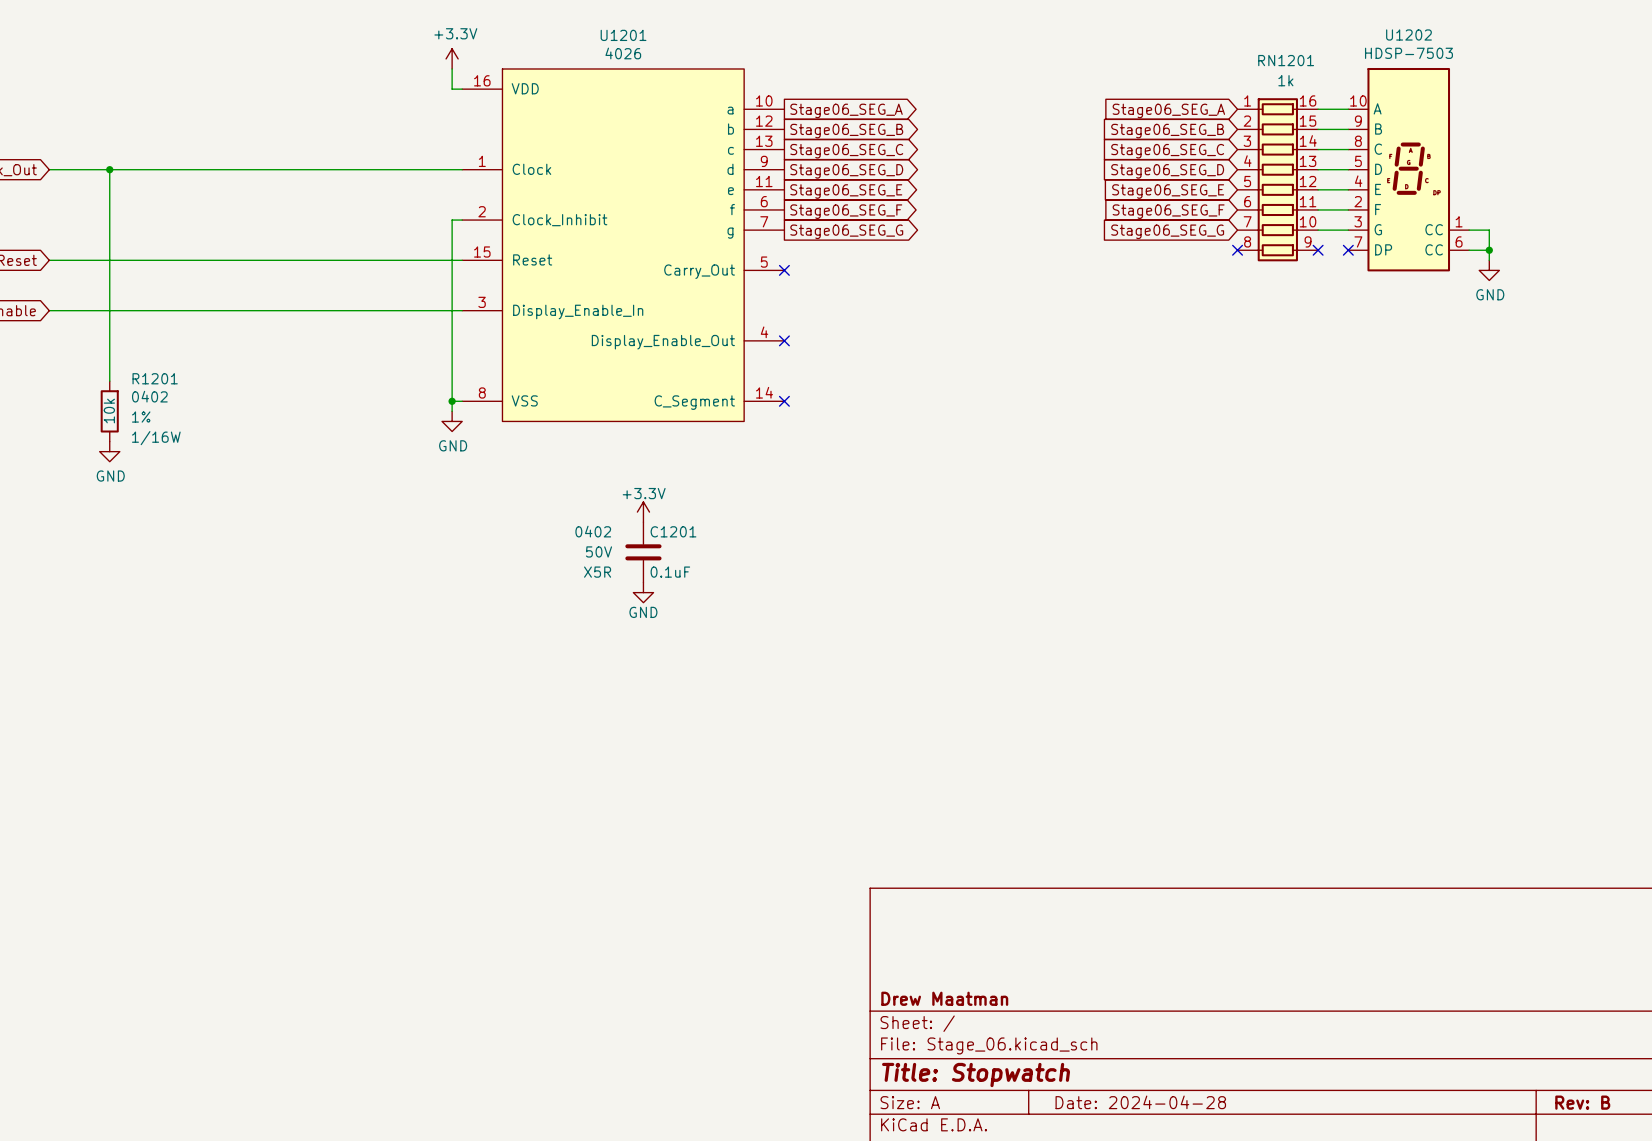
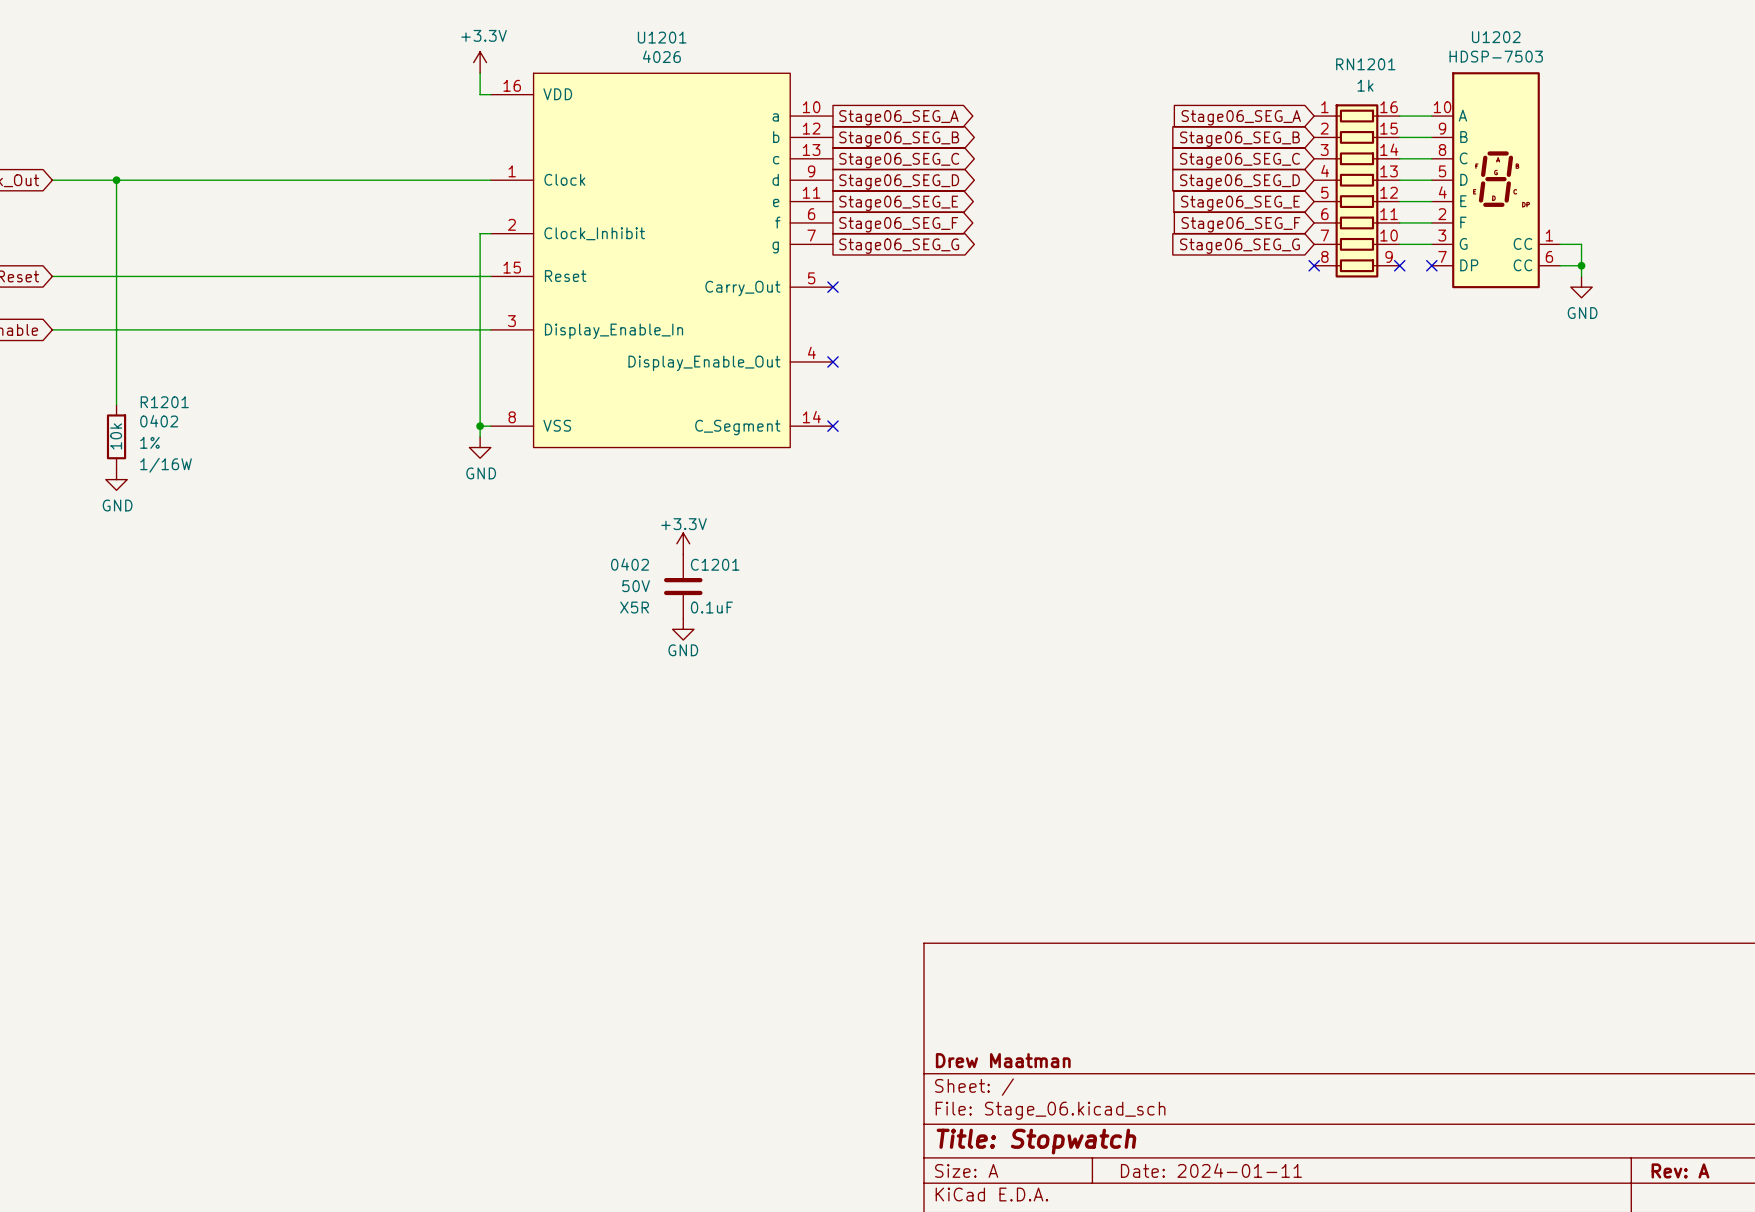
title block: Date: 2024-04-28 (1140, 1102) -> Date: 2024-01-11 (1211, 1170)
title block: Rev: B (1582, 1102) -> Rev: A (1680, 1170)

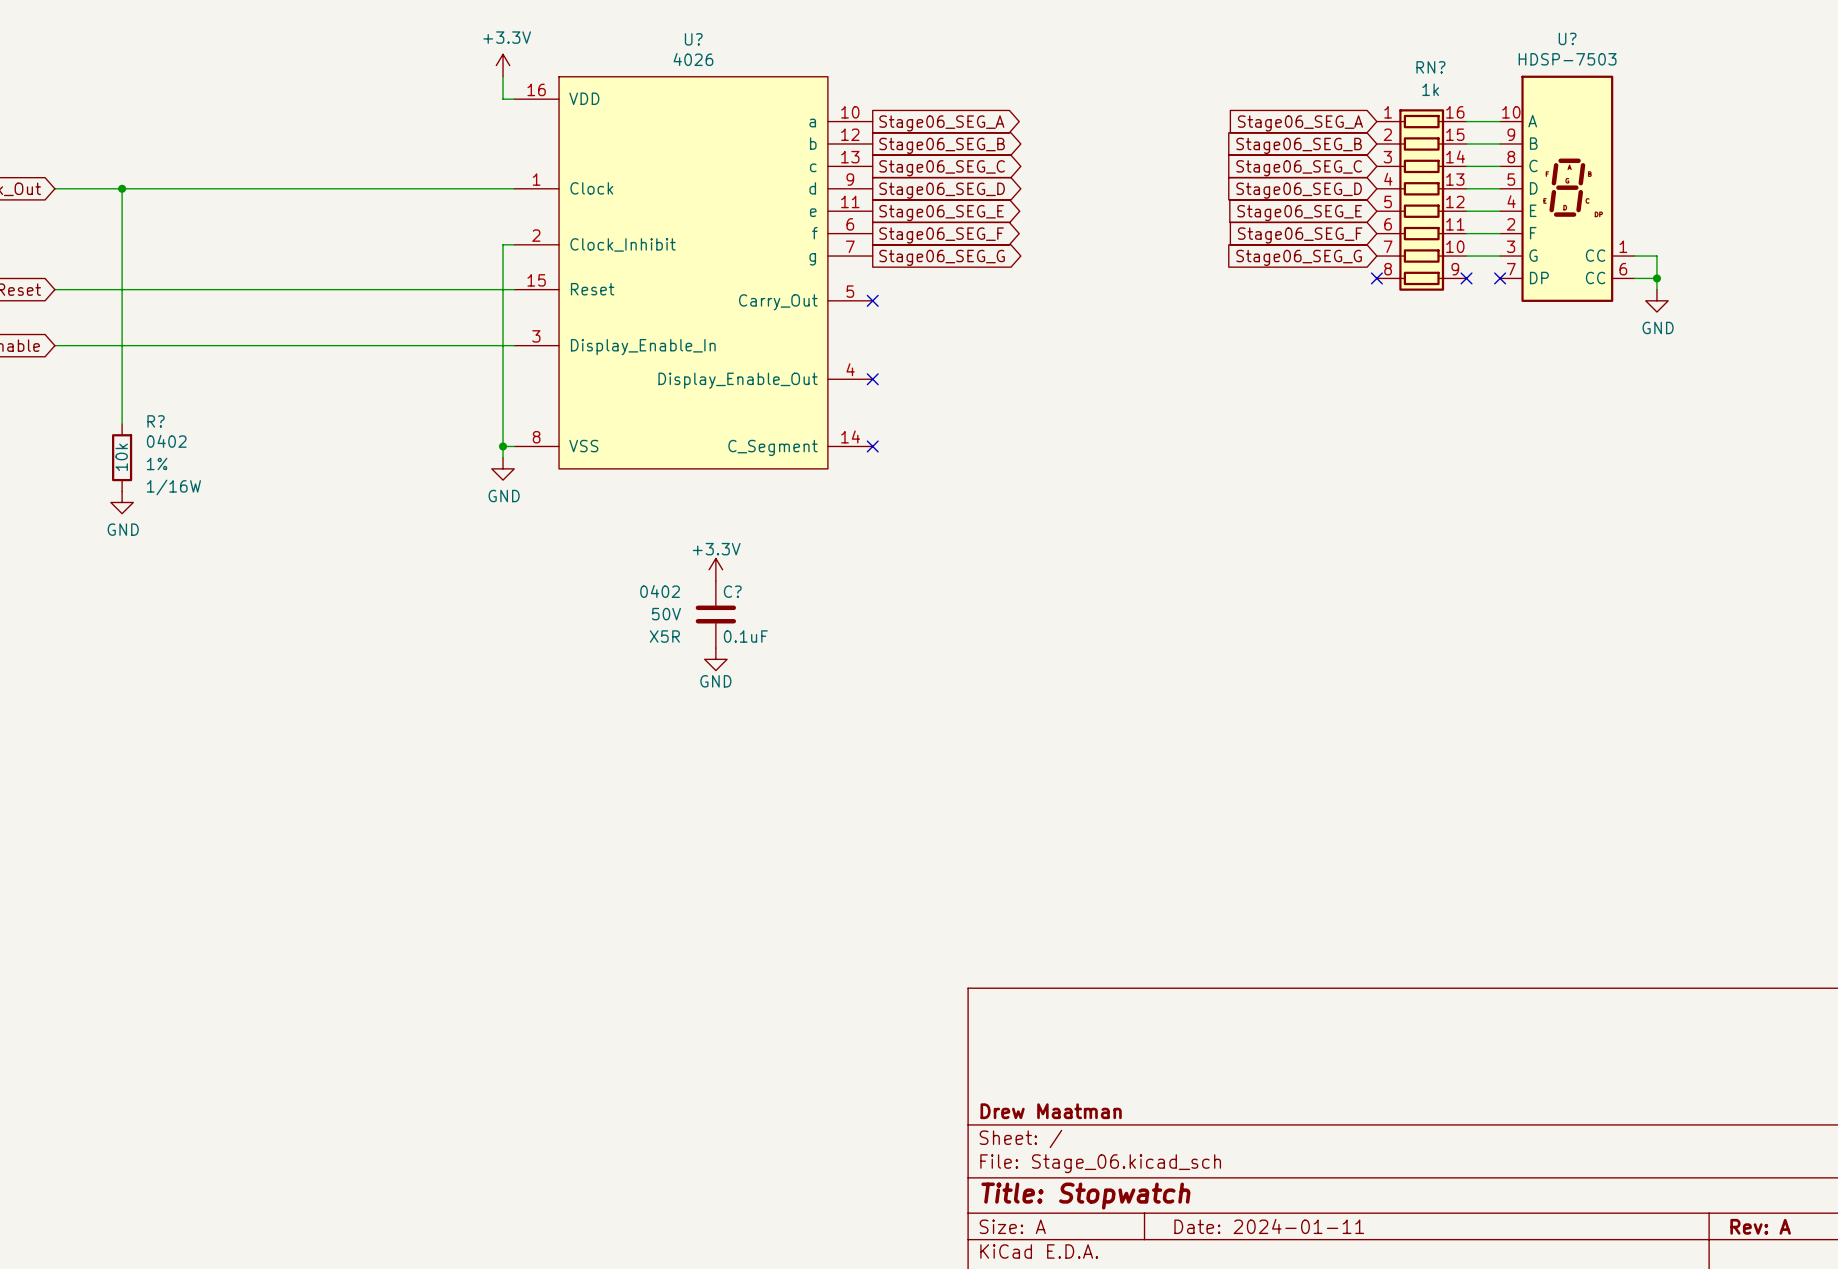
U1201 name: U1201 (662, 37) -> U? (693, 39)
U1202 name: U1202 (1496, 37) -> U? (1567, 38)
RN1201 name: RN1201 (1365, 64) -> RN? (1430, 67)
R1201 name: R1201 (164, 402) -> R? (156, 421)
C1201 name: C1201 (715, 564) -> C? (732, 591)

